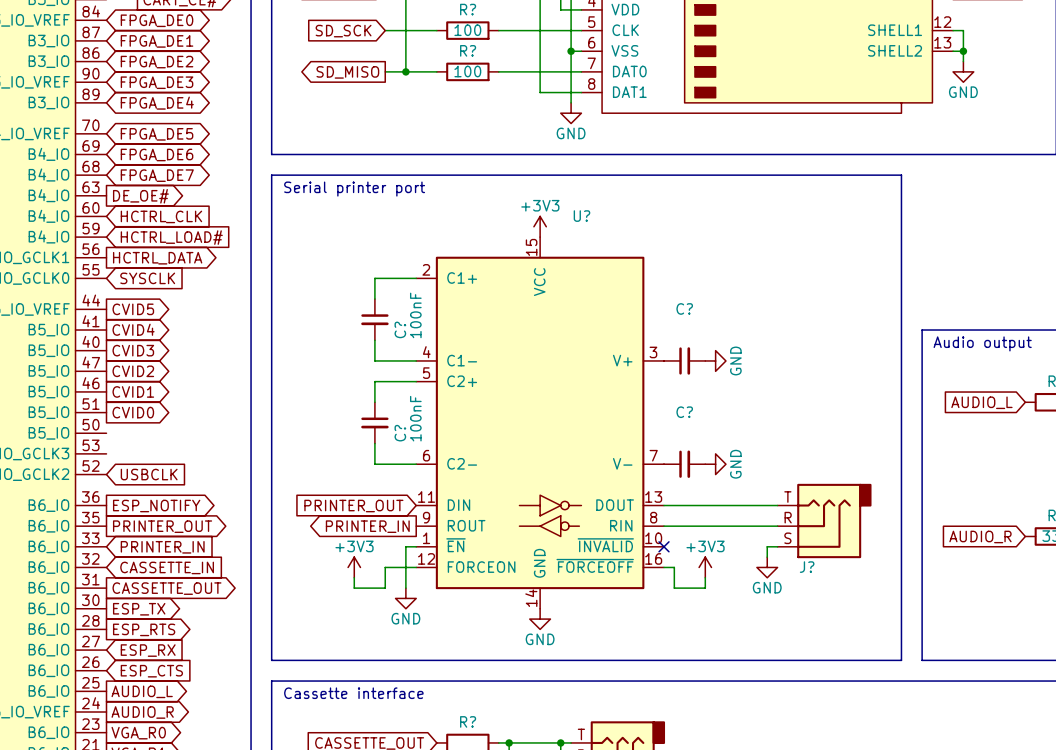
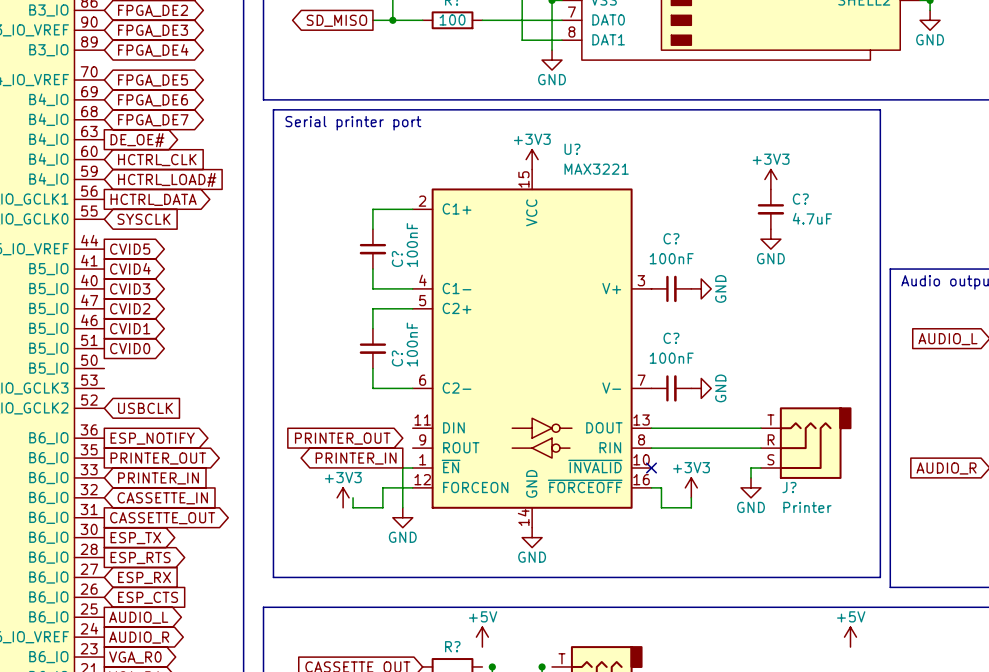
line: (271, 175) (271, 660) (901, 660) (901, 175) (271, 175) -> (273, 109) (273, 577) (880, 577) (880, 109) (273, 109)
text position: Serial printer port (354, 189) -> Serial printer port (353, 123)
power symbol position: +3V3 (540, 226) -> +3V3 (532, 159)
power symbol: none -> +3V3 (770, 179)
C?: none -> 4.7uF (770, 209)
wire: (416, 278) (374, 278) (374, 299) -> (412, 209) (372, 209) (372, 229)
power symbol: none -> GND (770, 239)
C? position: (374, 319) -> (372, 249)
wire: (374, 340) (374, 360) (416, 360) -> (372, 269) (372, 288) (412, 288)
C?: none -> 100nF (671, 288)
C?: (684, 360) -> none
power symbol position: GND (715, 360) -> GND (701, 288)
wire: (416, 381) (374, 381) (374, 402) -> (412, 308) (372, 308) (372, 328)
U?: none -> MAX3221 (532, 348)
C? position: (374, 422) -> (372, 348)
U?: (540, 422) -> none
wire: (374, 443) (374, 464) (416, 464) -> (372, 368) (372, 388) (412, 388)
C?: none -> 100nF (671, 388)
C?: (684, 464) -> none
power symbol position: GND (715, 464) -> GND (701, 388)
wire: (664, 505) (777, 505) -> (651, 428) (760, 428)
J?: none -> Printer (806, 443)
J?: (824, 521) -> none
wire: (664, 526) (777, 526) -> (651, 448) (760, 448)
wire: (416, 546) (405, 546) (405, 588) -> (412, 468) (402, 468) (402, 507)
no-connect mark position: (664, 546) -> (651, 468)
wire: (777, 546) (767, 546) (767, 557) -> (751, 477) (751, 468) (760, 468)
wire: (416, 567) (385, 567) (385, 588) (354, 588) (354, 577) -> (412, 487) (382, 487) (382, 507) (353, 507) (353, 497)
wire: (664, 567) (674, 567) (674, 588) (705, 588) (705, 577) -> (651, 487) (661, 487) (661, 507) (691, 507) (691, 497)
power symbol position: +3V3 (705, 567) -> +3V3 (691, 487)
power symbol position: GND (767, 567) -> GND (751, 487)
power symbol position: GND (405, 598) -> GND (402, 517)
power symbol position: GND (540, 619) -> GND (532, 537)
text: Cassette interface (353, 693) -> none
power symbol: none -> +5V (482, 637)
power symbol: none -> +5V (850, 637)
wire: (498, 742) (571, 742) -> none

